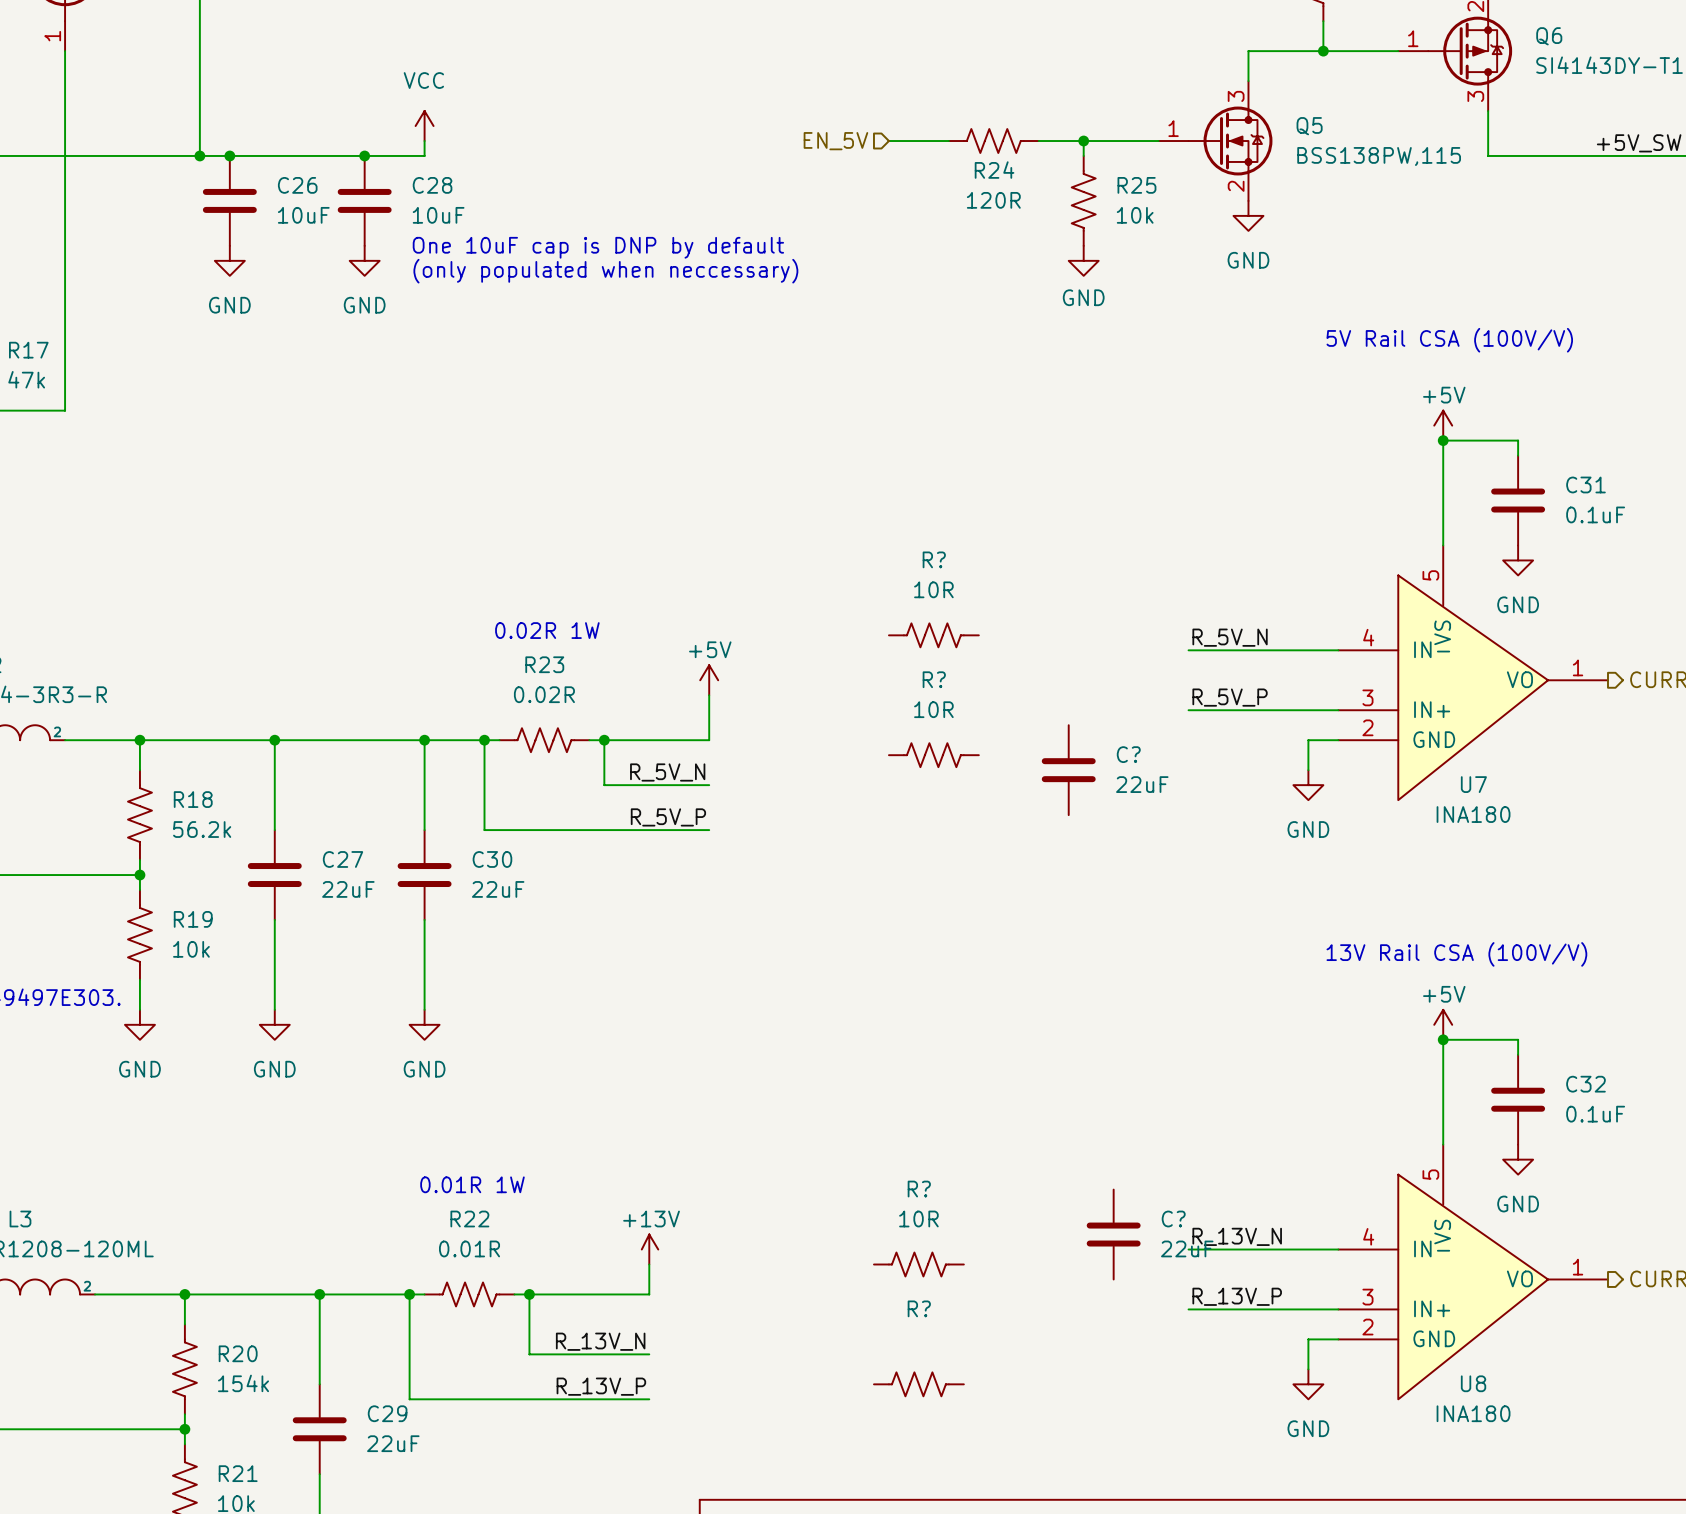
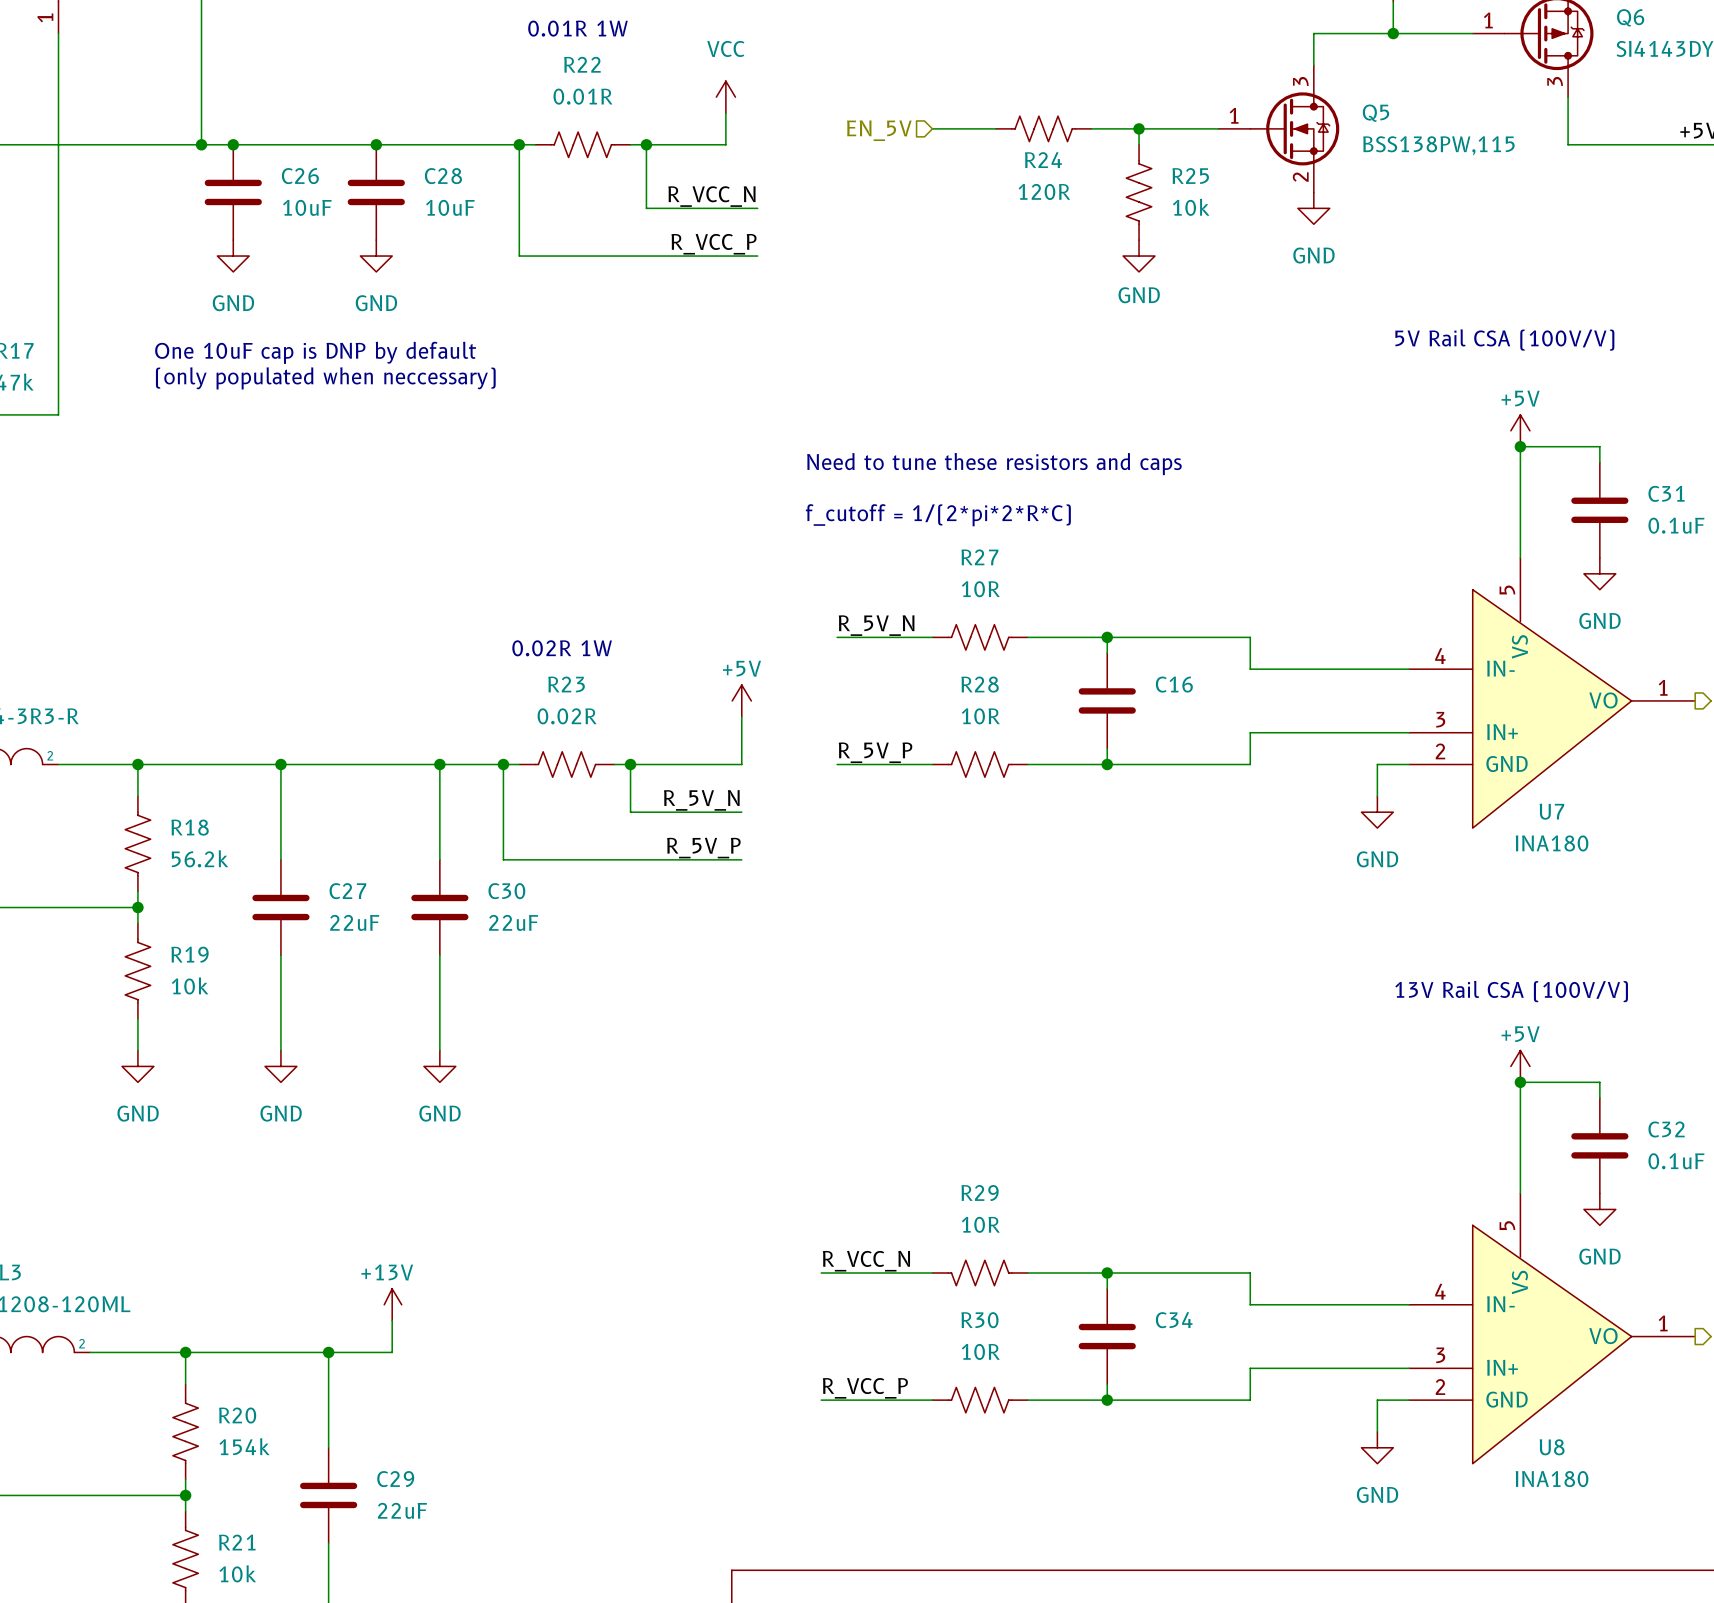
text: none -> 0.01R 1W (577, 28)
power symbol position: VCC (424, 126) -> VCC (725, 97)
wire: none -> (725, 113) (725, 144) (630, 144)
wire: (424, 141) (424, 155) -> (535, 144) (439, 144)
wire: none -> (519, 144) (519, 256) (757, 256)
junction: none -> (519, 144)
wire: none -> (646, 144) (646, 208) (757, 208)
junction: none -> (646, 144)
label: none -> R_VCC_N (711, 196)
text position: One 10uF cap is DNP by default (598, 247) -> One 10uF cap is DNP by default (315, 352)
label: none -> R_VCC_P (714, 244)
text position: (only populated when neccessary) (605, 271) -> (only populated when neccessary) (325, 378)
text: none -> Need to tune these resistors and caps (994, 464)
text: none -> f_cutoff = 1/(2*pi*2*R*C) (938, 515)
label: none -> R_5V_N (876, 625)
wire: none -> (837, 637) (932, 637)
R27: none -> 10R (980, 637)
wire: none -> (1027, 637) (1250, 637) (1250, 669)
wire: none -> (1107, 637) (1107, 653)
junction: none -> (1107, 637)
R?: 10R (933, 635) -> none
label: R_5V_N (1230, 637) -> none
C16: none -> (1107, 700)
label: R_5V_P (1230, 697) -> none
wire: none -> (1250, 732) (1250, 764) (1027, 764)
wire: none -> (1107, 748) (1107, 764)
label: none -> R_5V_P (875, 752)
wire: none -> (837, 764) (932, 764)
R28: none -> 10R (980, 764)
junction: none -> (1107, 764)
R?: 10R (933, 755) -> none
C?: 22uF (1068, 770) -> none
text: 0.01R 1W (472, 1184) -> none
label: none -> R_VCC_N (866, 1261)
wire: none -> (821, 1273) (932, 1273)
R29: none -> 10R (980, 1273)
wire: none -> (1027, 1273) (1250, 1273) (1250, 1304)
wire: none -> (1107, 1273) (1107, 1288)
junction: none -> (1107, 1273)
C?: 22uF (1113, 1234) -> none
label: R_13V_N (1237, 1236) -> none
power symbol position: +13V (650, 1249) -> +13V (392, 1304)
wire: (649, 1264) (649, 1294) (514, 1294) -> none
R?: 10R (918, 1264) -> none
C34: none -> (1107, 1336)
wire: (379, 1294) (424, 1294) -> (392, 1352) (392, 1320)
wire: (409, 1294) (409, 1399) (649, 1399) -> none
junction: (409, 1294) -> none
R22 position: (469, 1294) -> (582, 144)
wire: (529, 1294) (529, 1354) (649, 1354) -> none
junction: (529, 1294) -> none
label: R_13V_P (1237, 1296) -> none
wire: none -> (1250, 1368) (1250, 1400) (1027, 1400)
wire: none -> (1107, 1384) (1107, 1400)
label: none -> R_VCC_P (865, 1388)
wire: none -> (821, 1400) (932, 1400)
R30: none -> 10R (980, 1400)
junction: none -> (1107, 1400)
label: R_13V_N (600, 1341) -> none
R?: (918, 1384) -> none
label: R_13V_P (601, 1386) -> none

